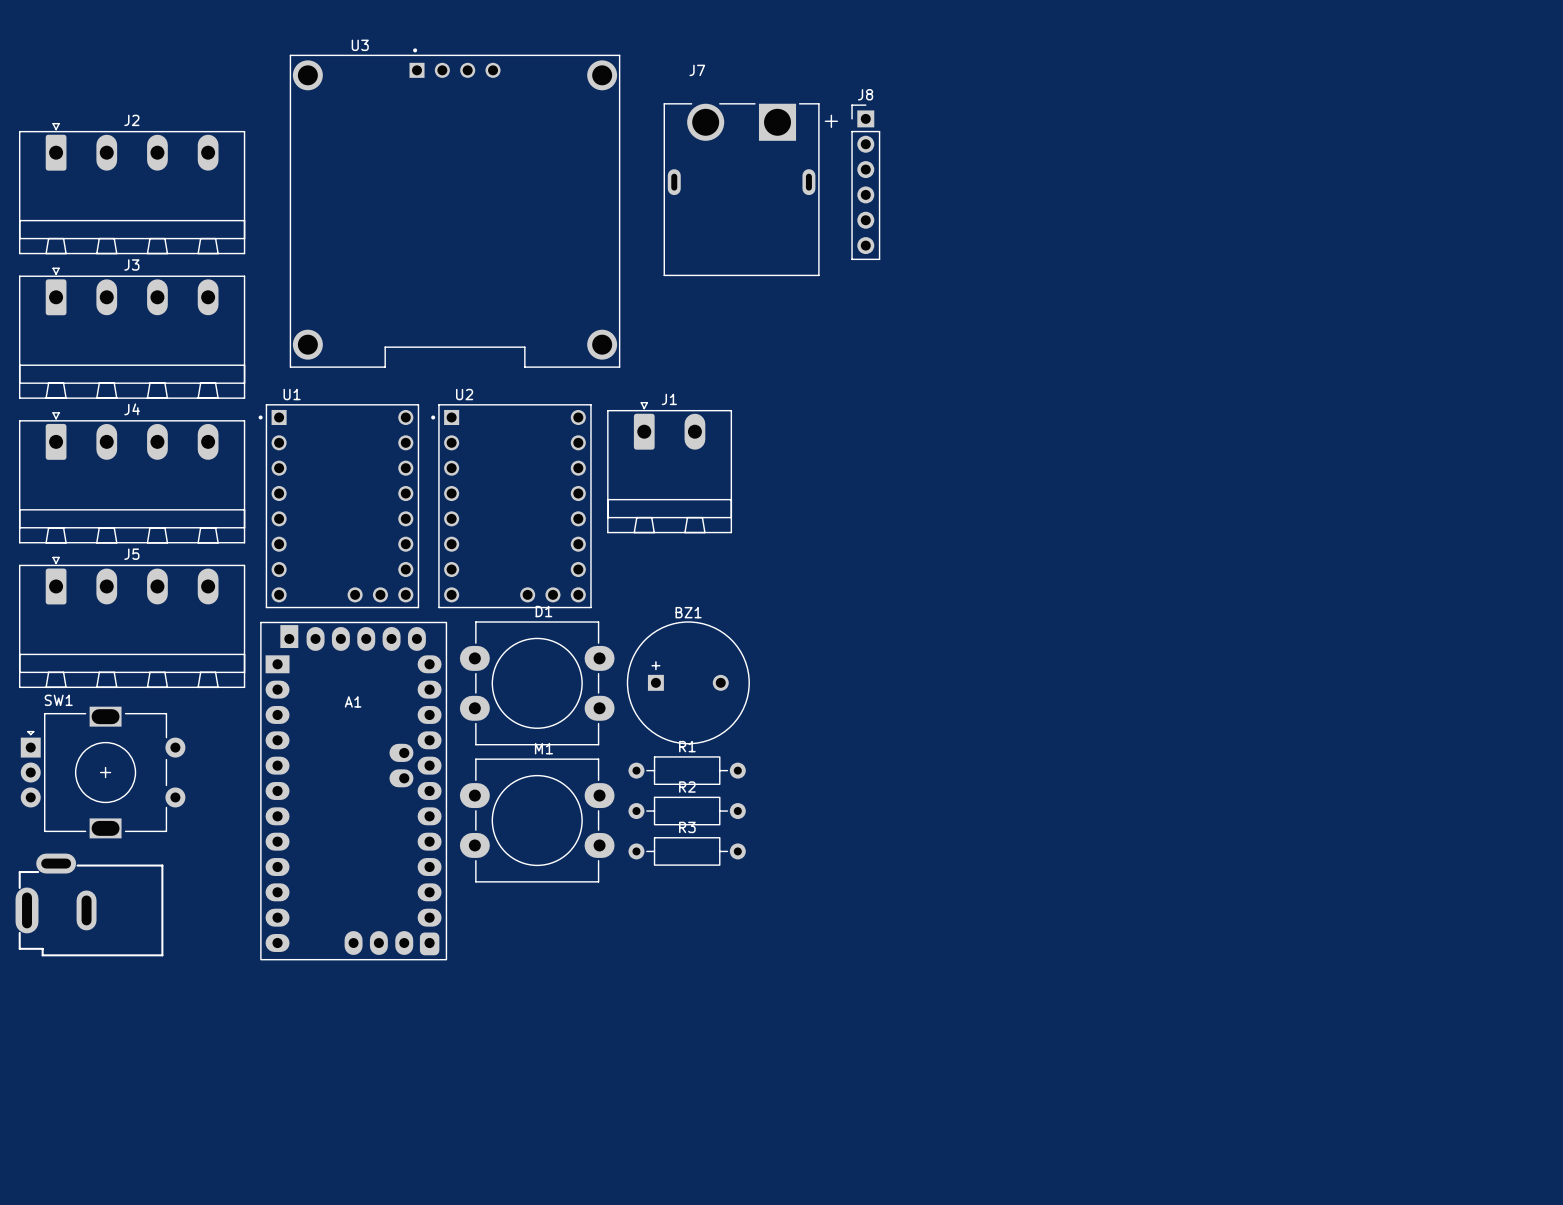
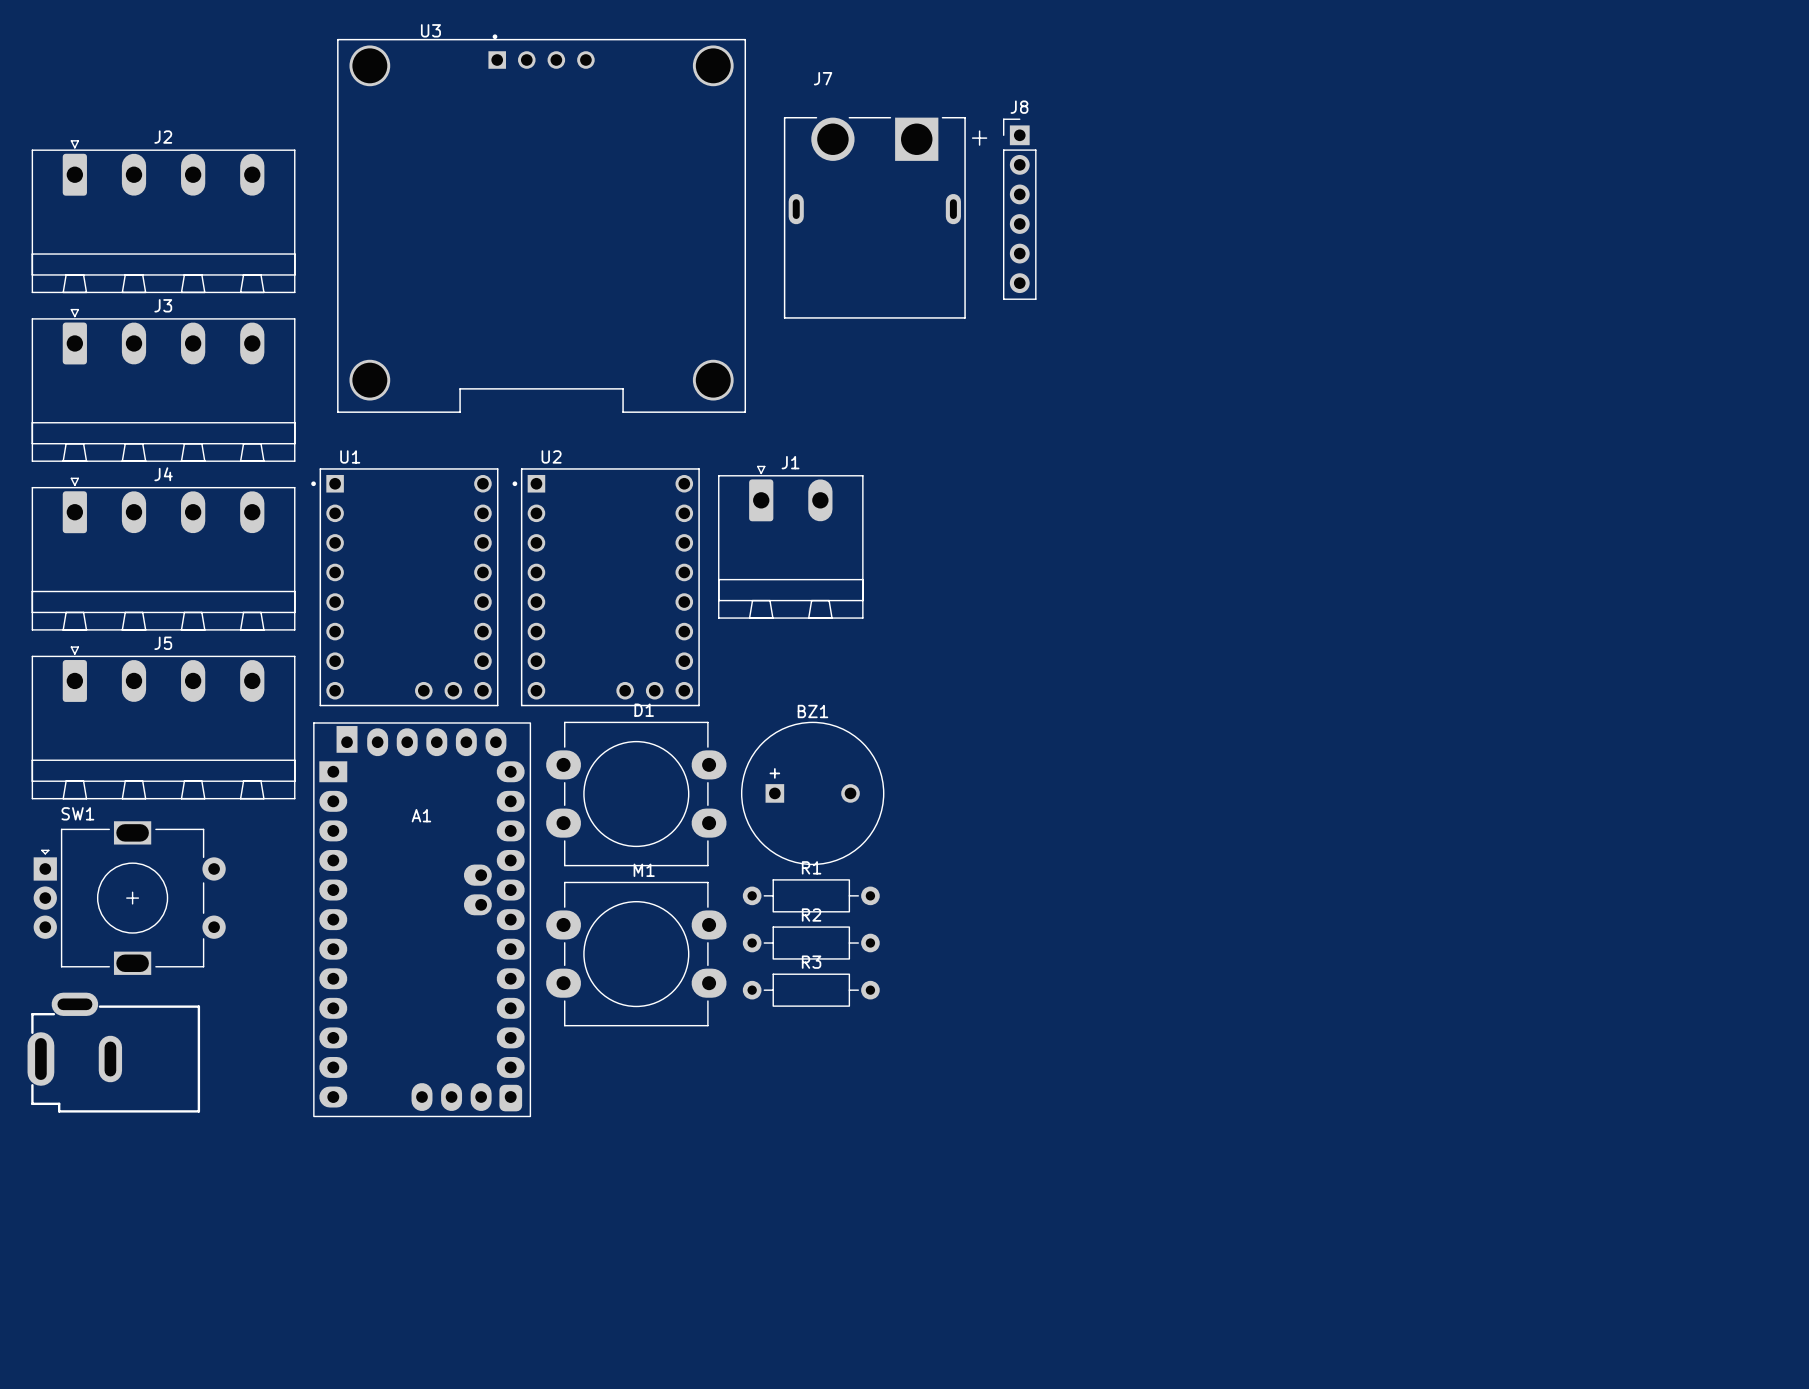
U3 footprint: [289, 48, 621, 368] -> [337, 34, 747, 413]

